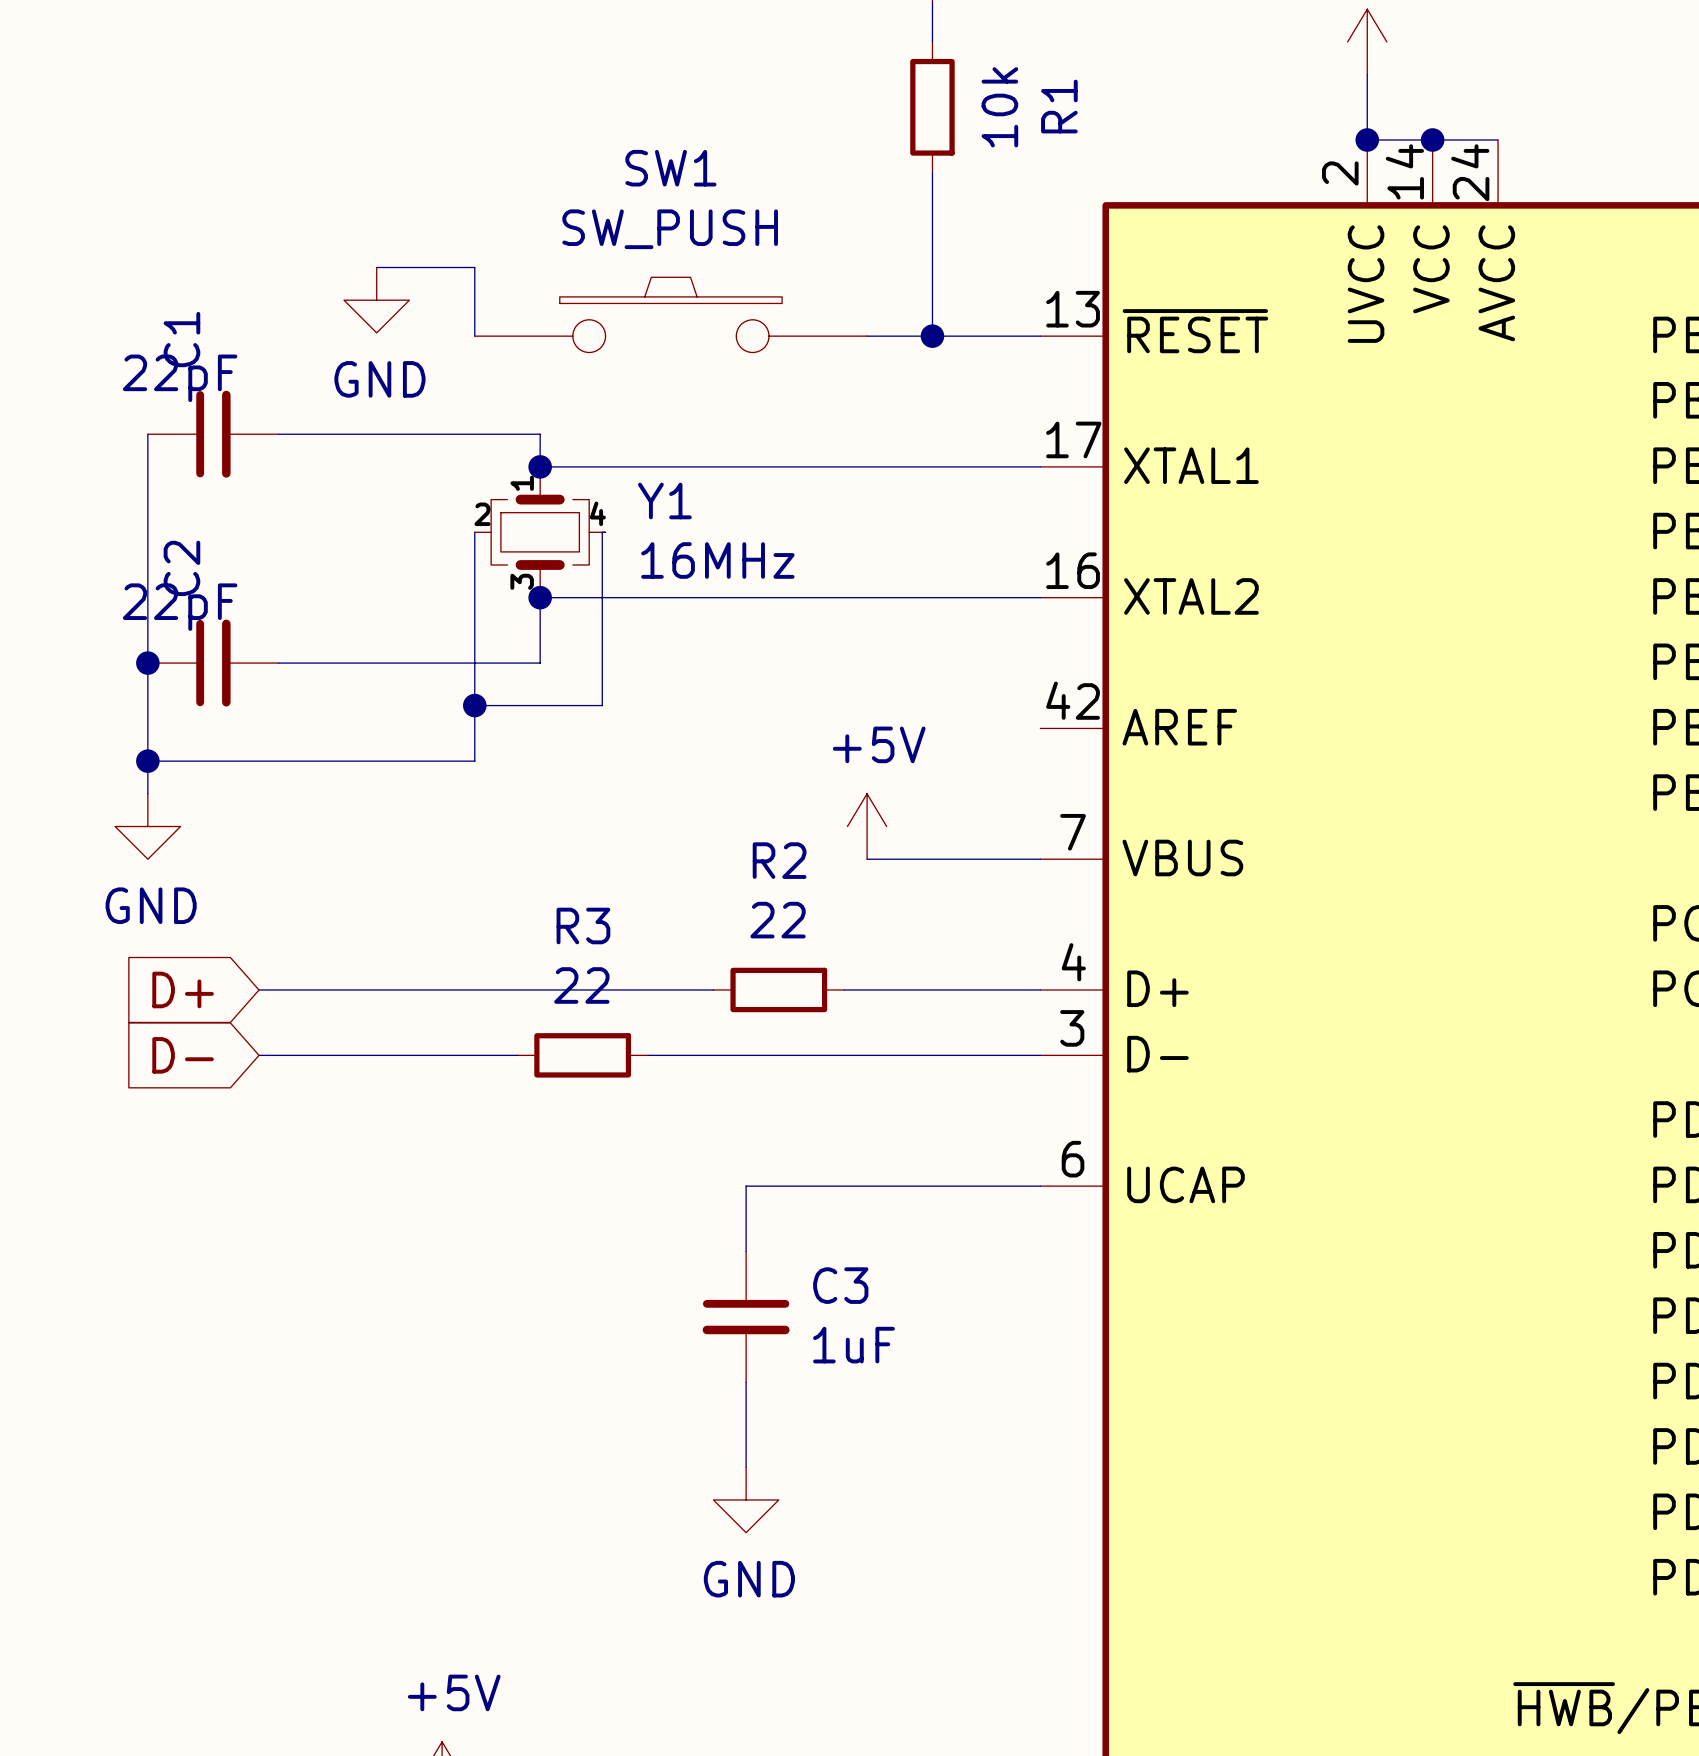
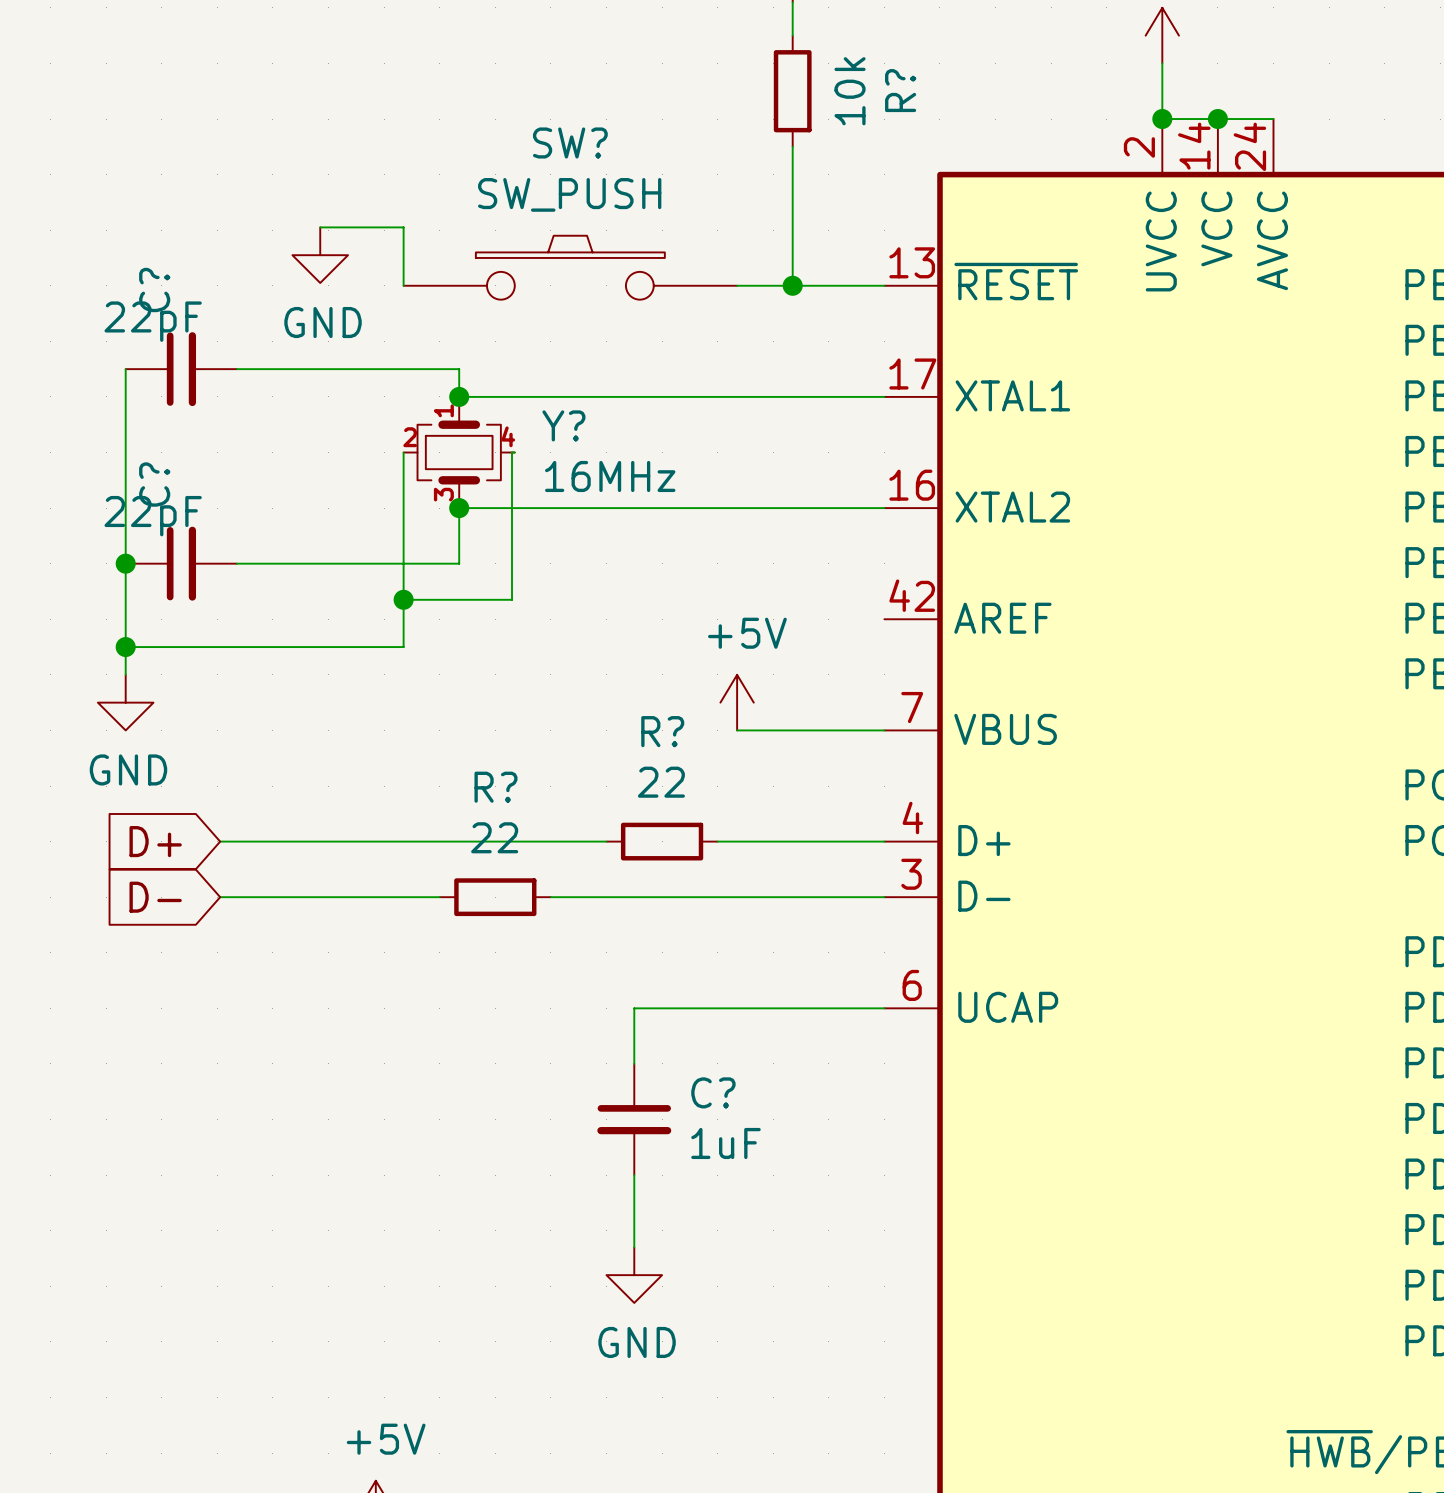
R1 name: R1 (1059, 106) -> R? (900, 90)
SW1 name: SW1 (670, 168) -> SW? (570, 142)
C1 name: C1 (181, 339) -> C? (154, 290)
Y1 name: Y1 (664, 501) -> Y? (563, 425)
C2 name: C2 (181, 568) -> C? (154, 484)
R2 name: R2 (779, 860) -> R? (662, 731)
R3 name: R3 (583, 925) -> R? (495, 787)
C3 name: C3 (840, 1285) -> C? (713, 1092)

